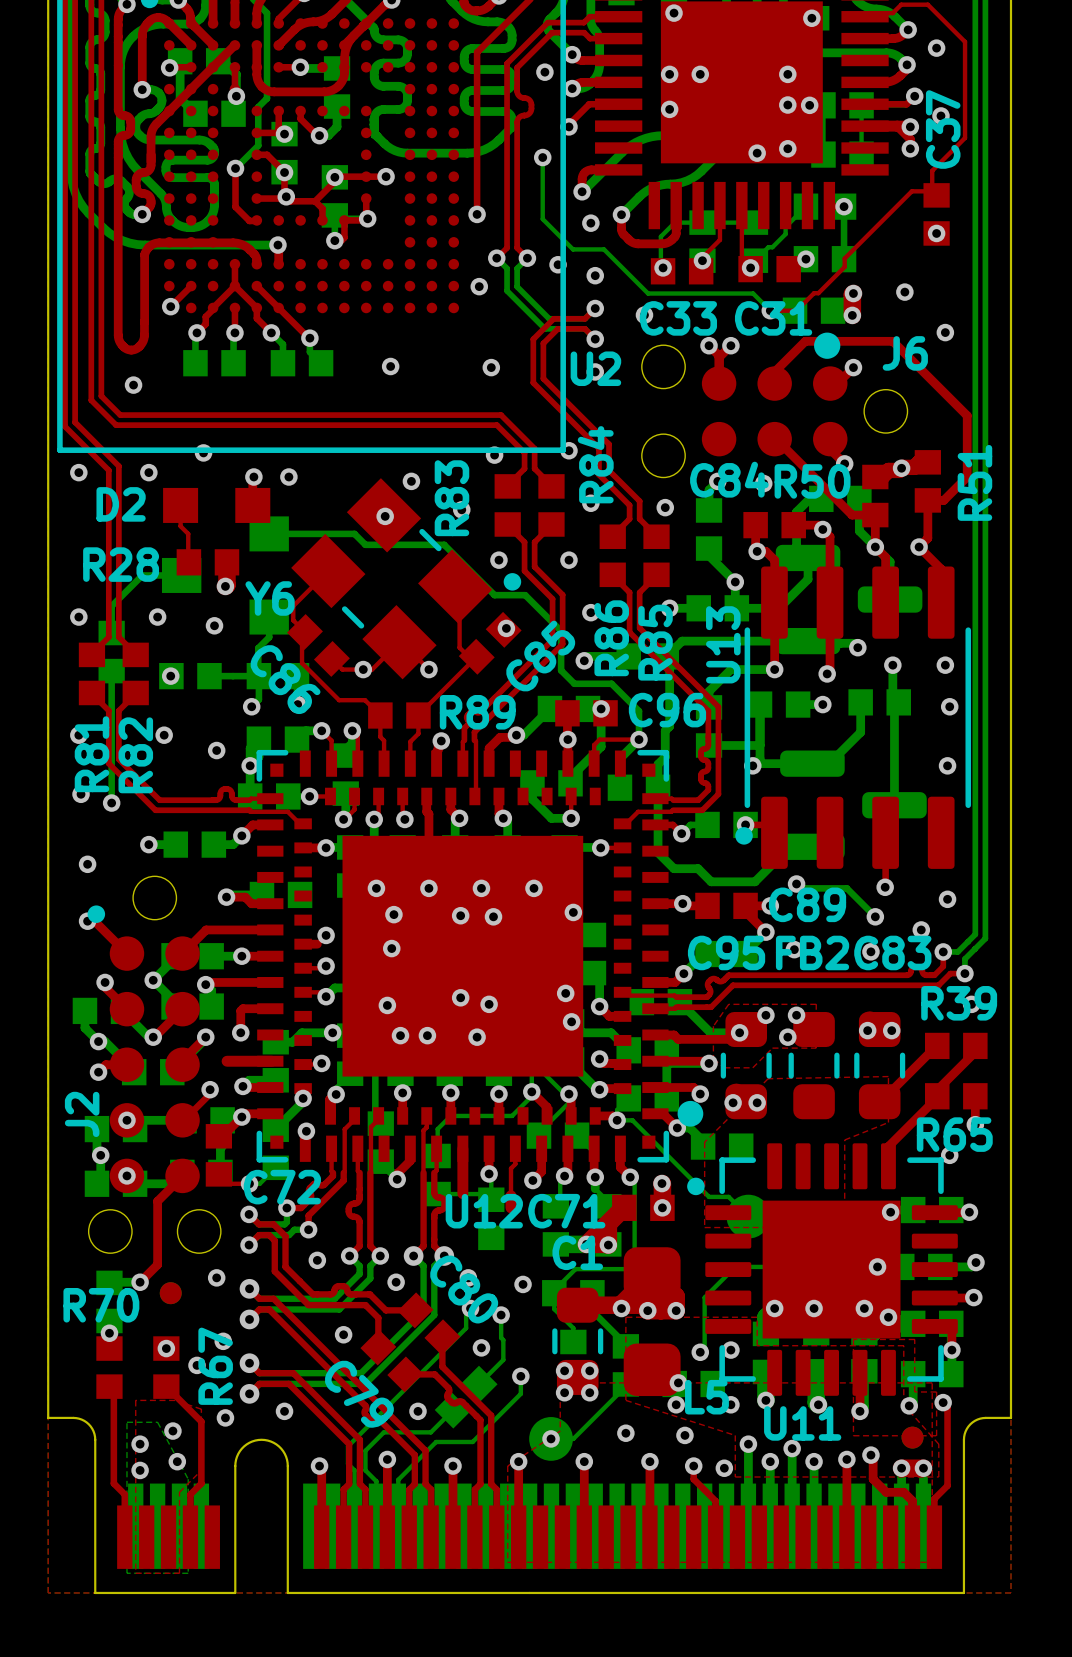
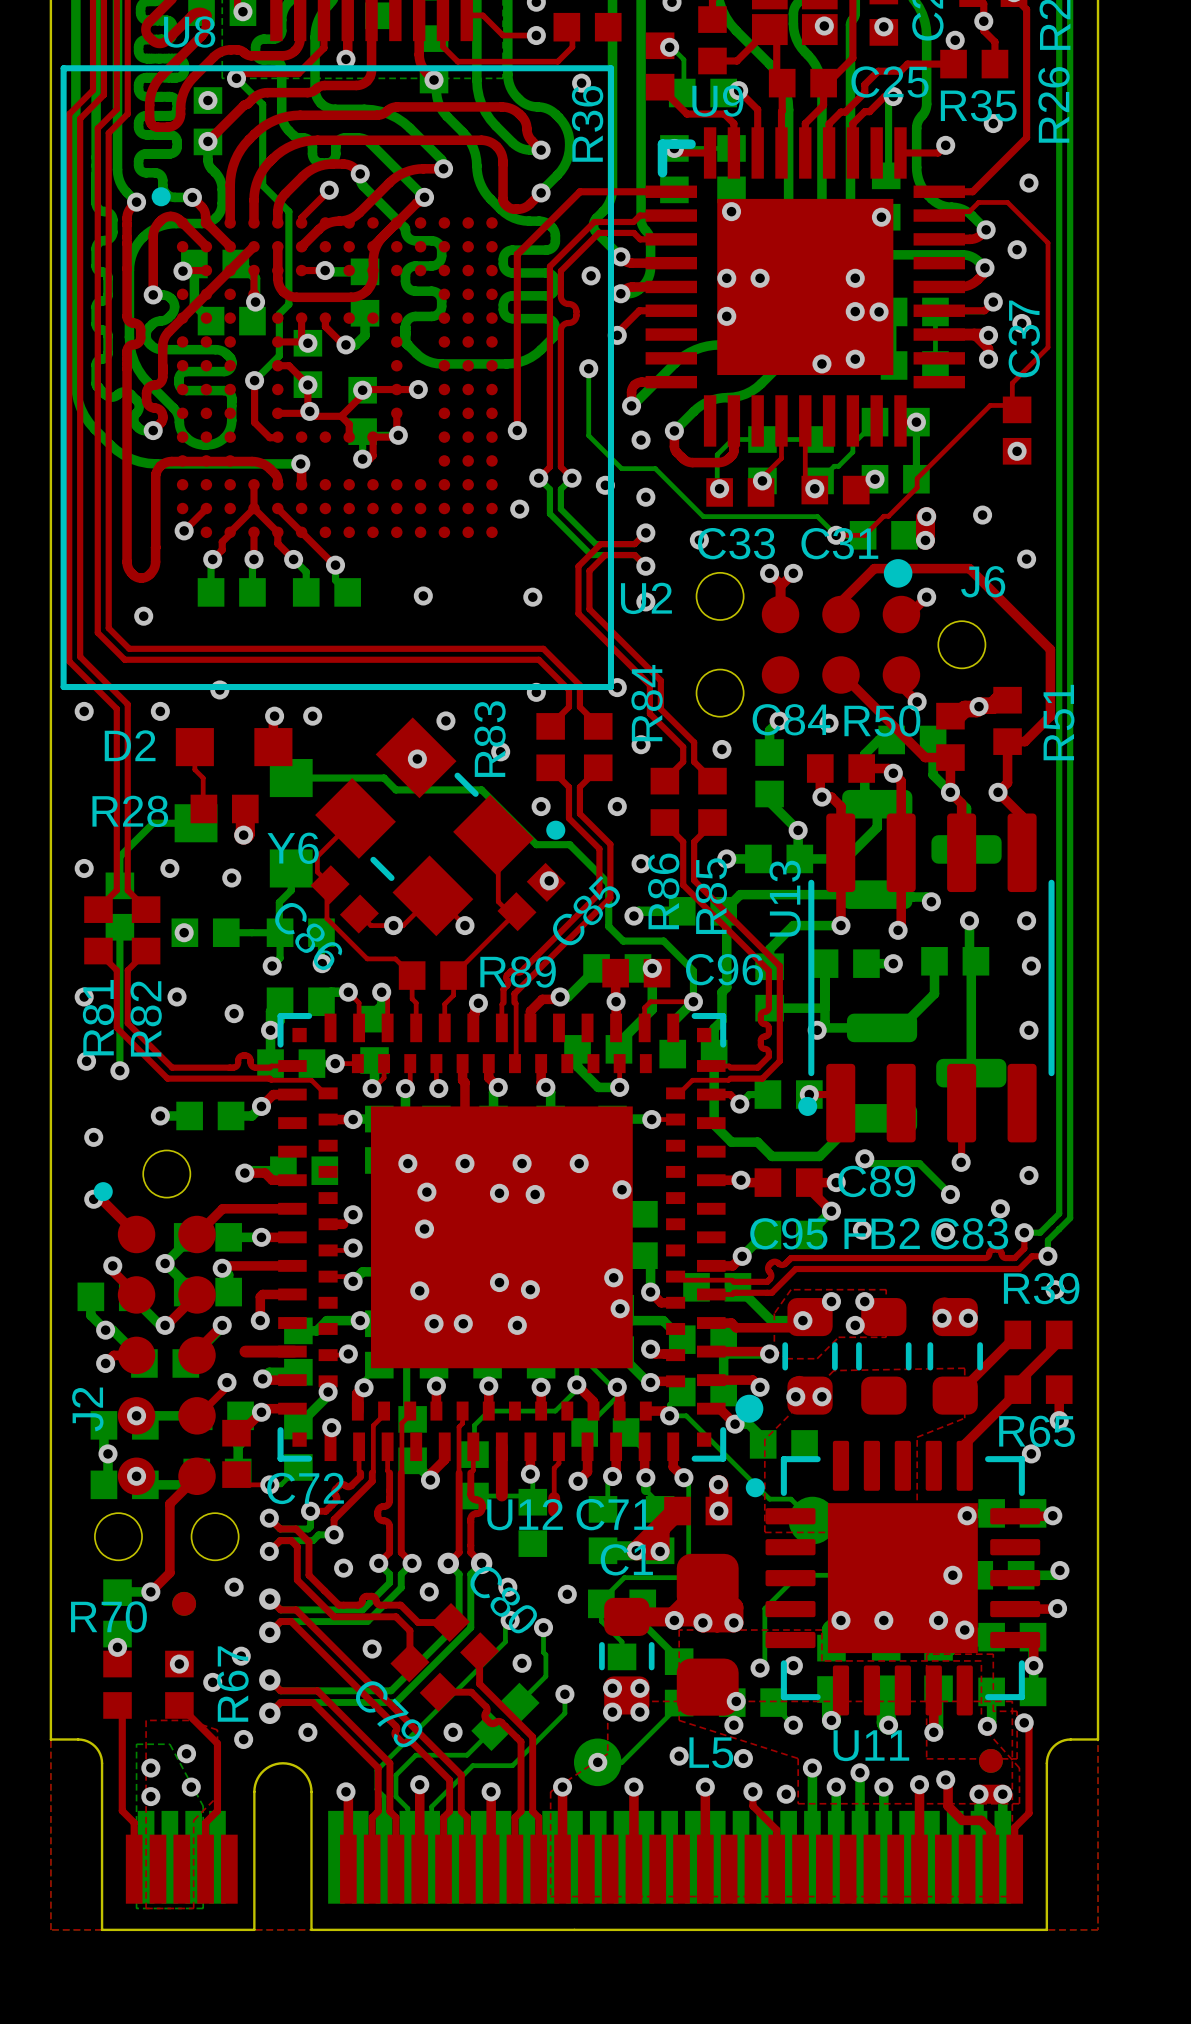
L5 name position: L5 (706, 1397) -> L5 (711, 1752)

